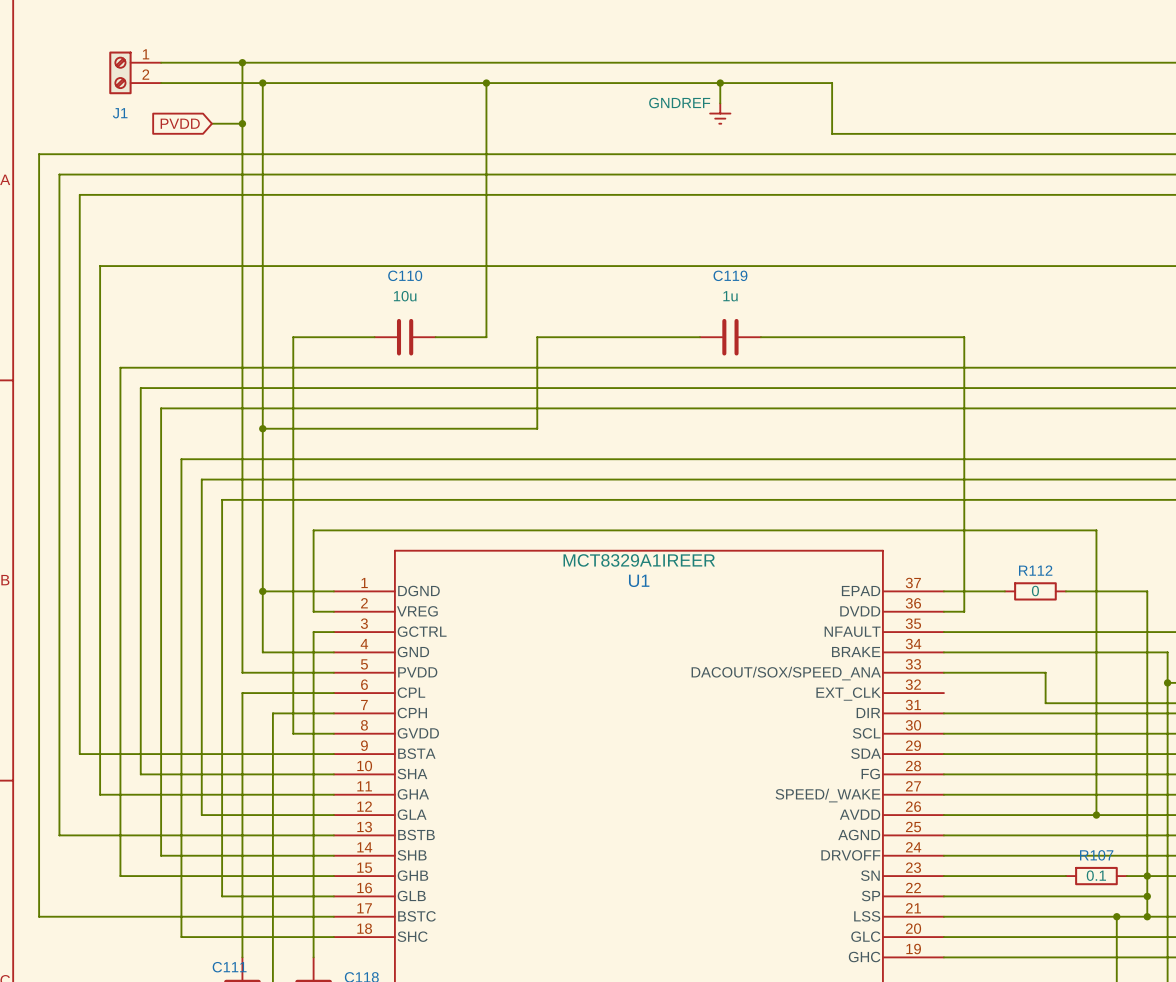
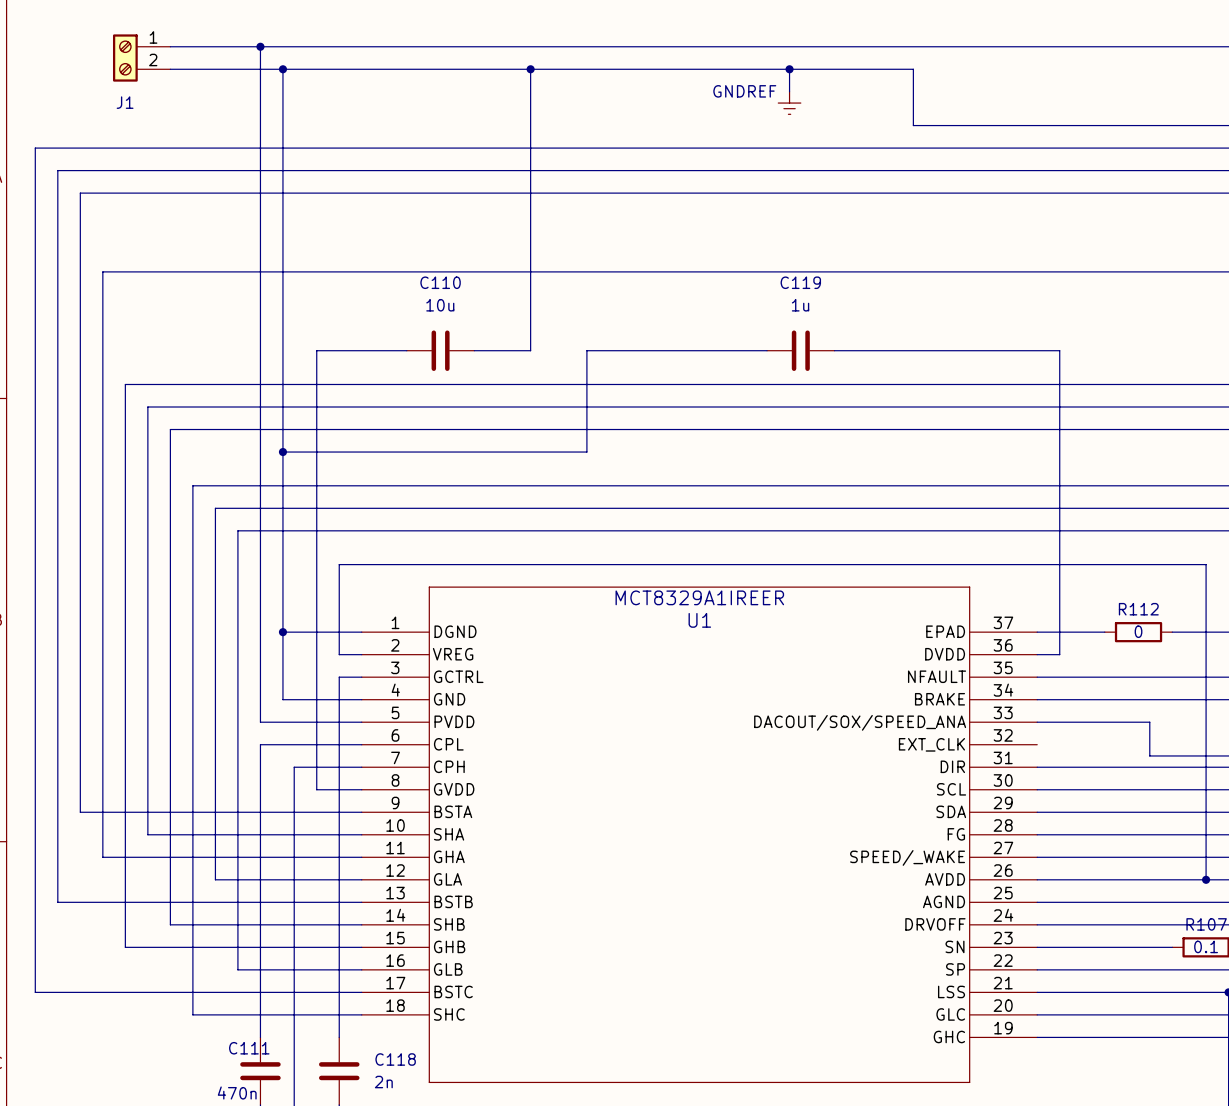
global label: PVDD (180, 123) -> none
wire: (211, 123) (242, 123) -> none
junction: (242, 123) -> none

